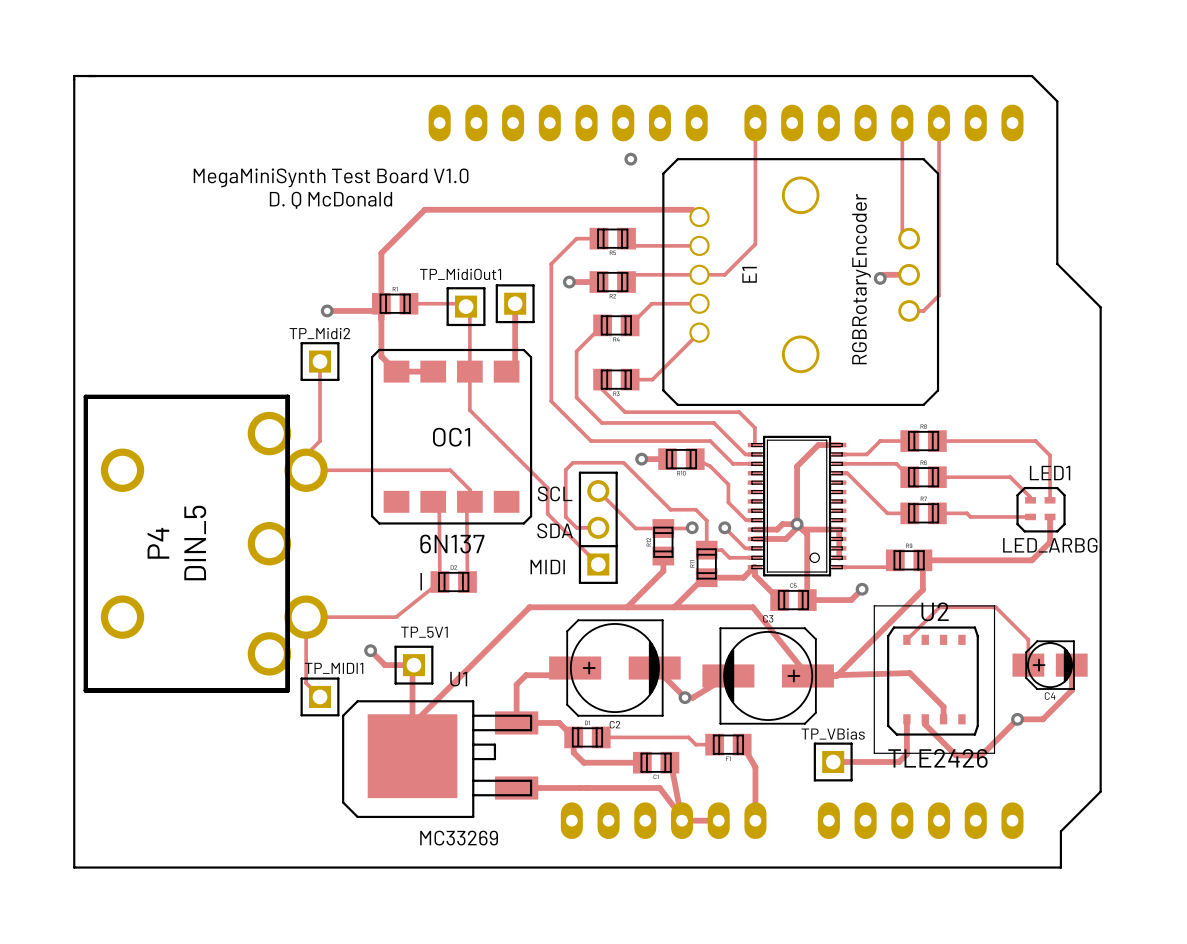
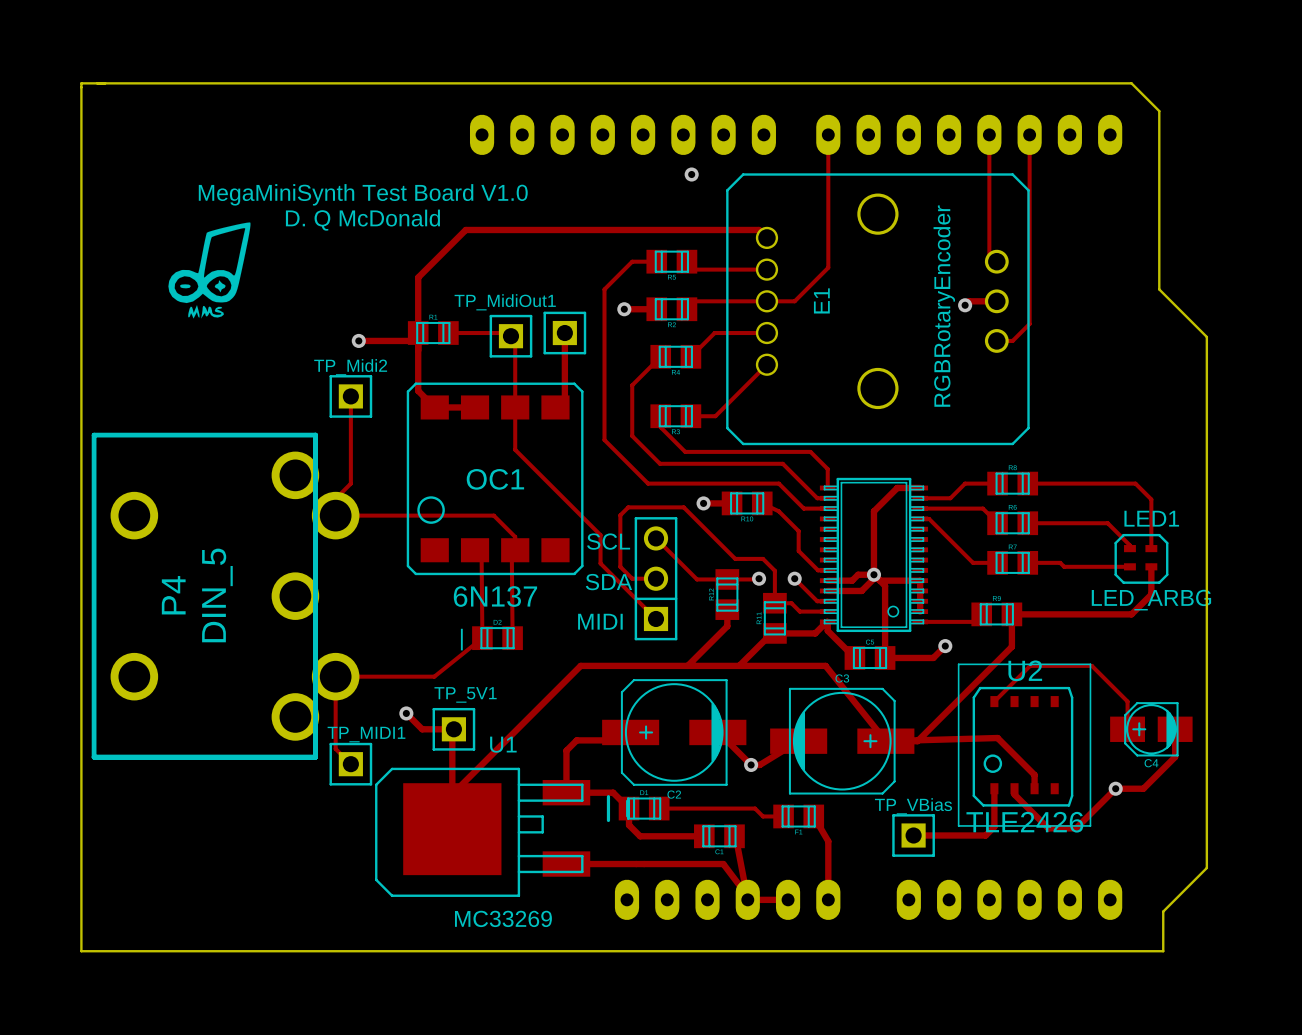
drawing: none -> [168, 222, 251, 319]
OC1 footprint: [370, 348, 533, 525] -> [406, 382, 584, 576]
U2 footprint: [874, 605, 995, 754] -> [958, 664, 1091, 826]
line: none -> (608, 796) (608, 820)

